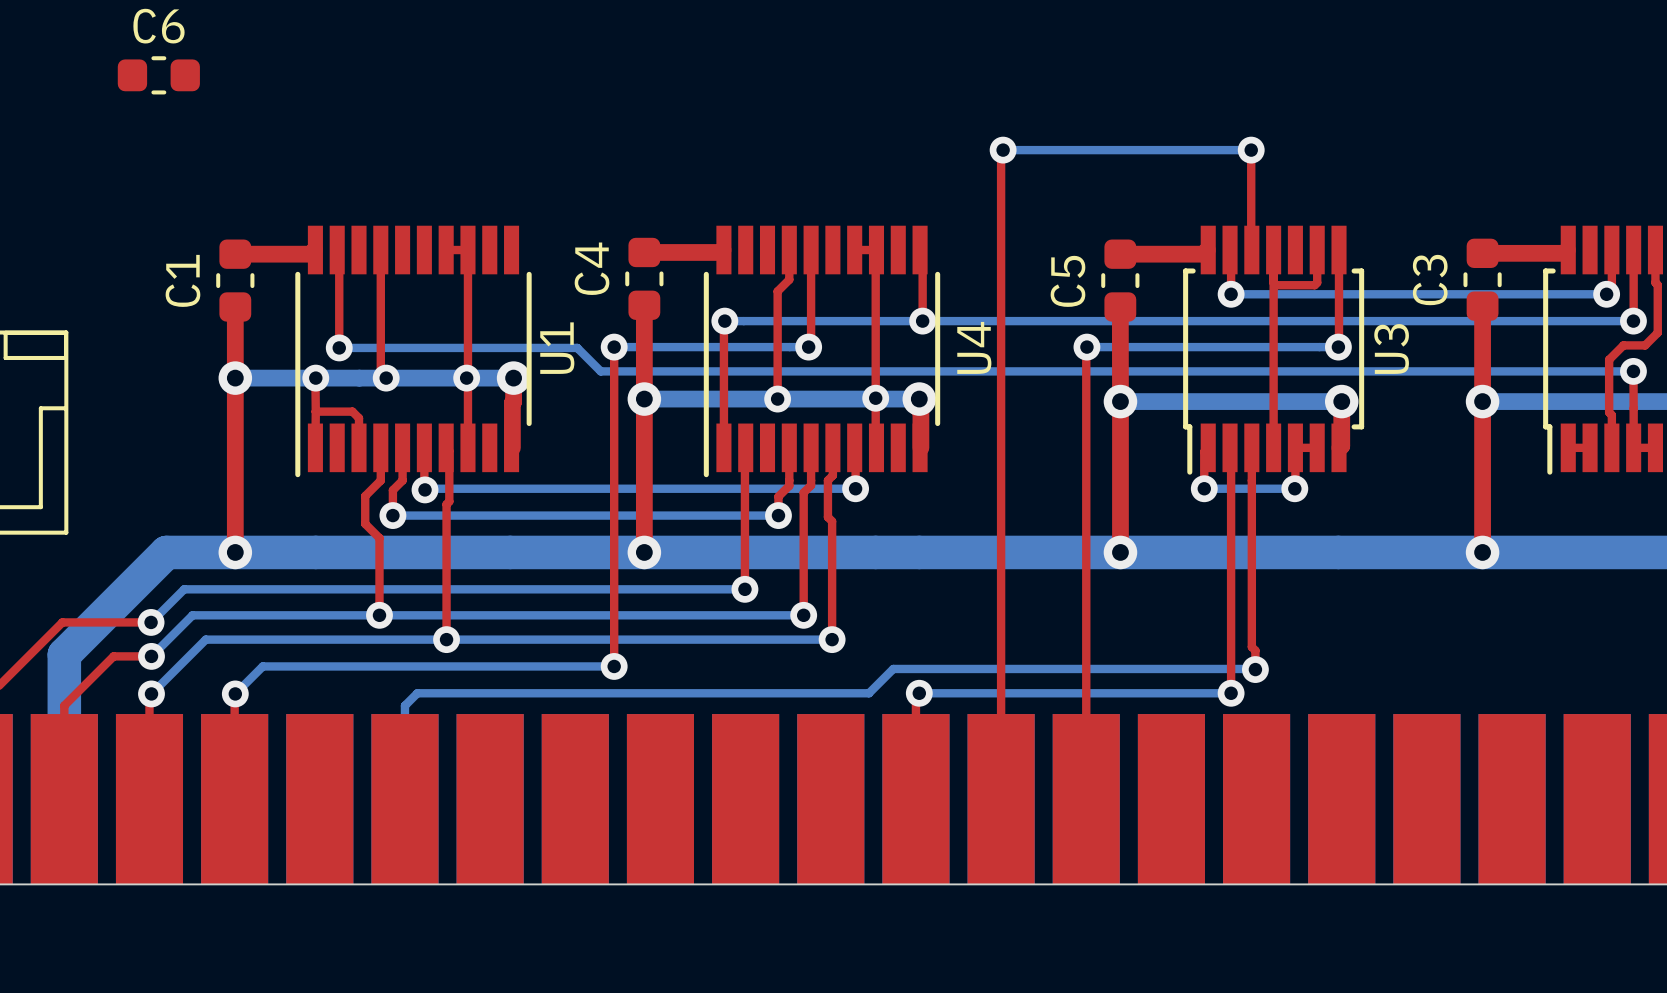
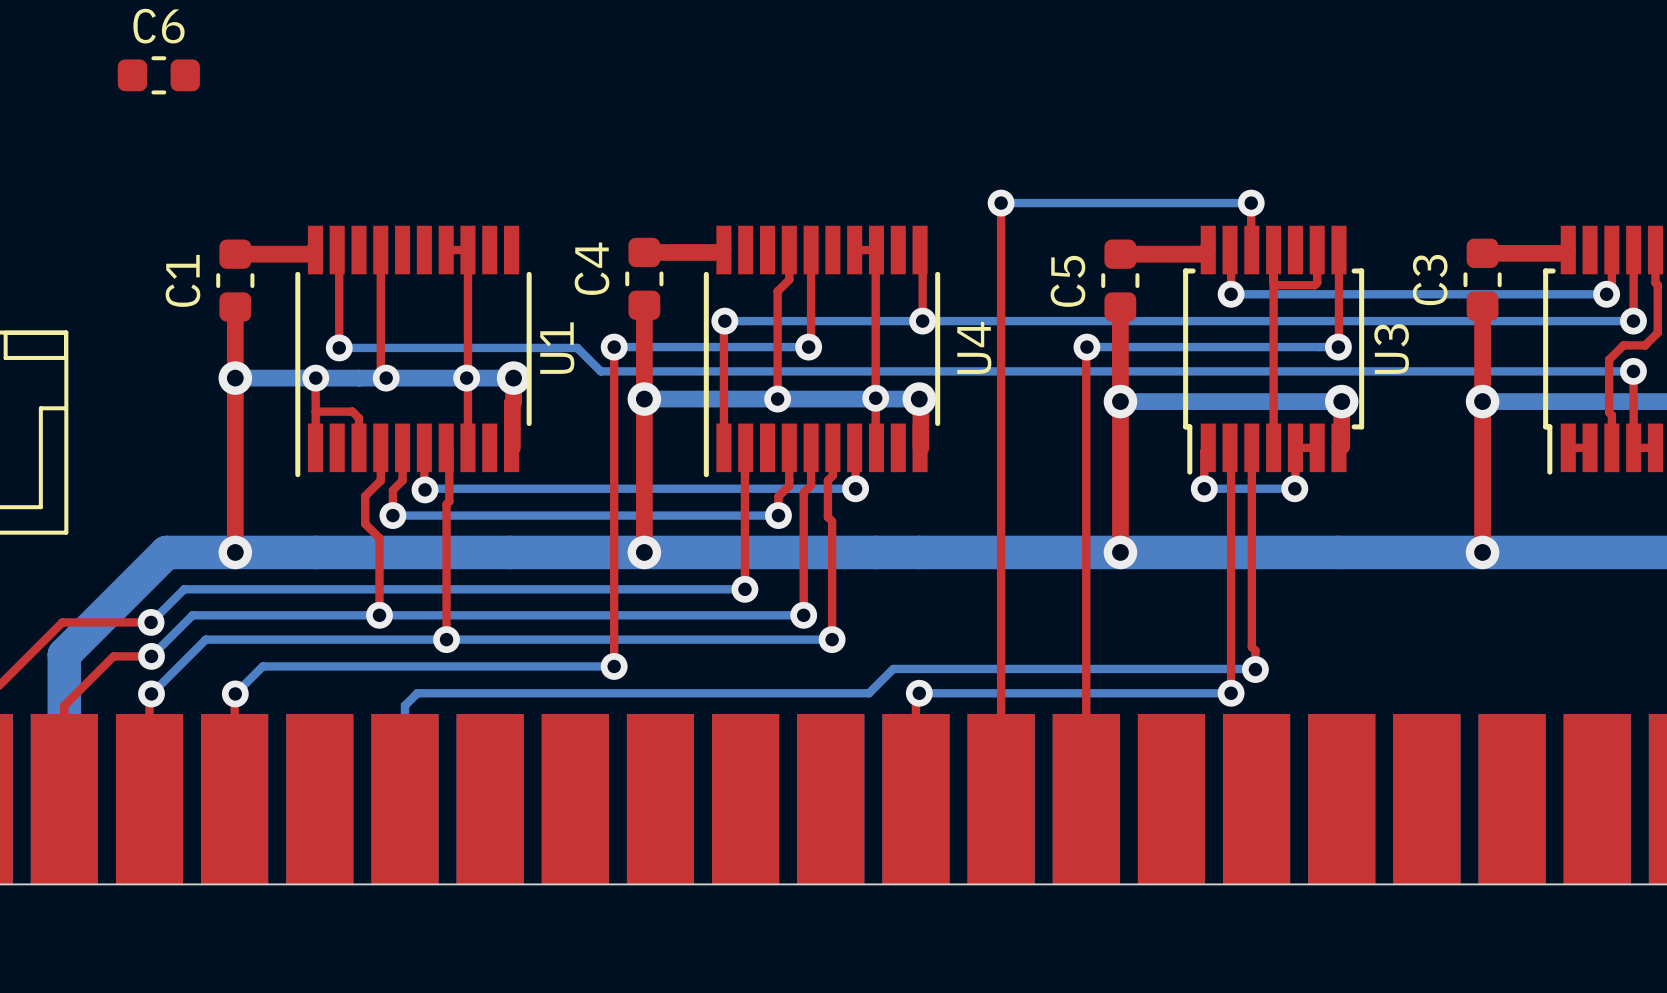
bottom track: (1003, 150) (1251, 150) -> none
top track: (1003, 150) (1001, 152) (1001, 203) -> none
via position: (1003, 150) -> (1001, 203)
top track: (1251, 150) (1251, 201) -> none
via position: (1251, 150) -> (1251, 203)
bottom track: none -> (1001, 203) (1251, 203)

